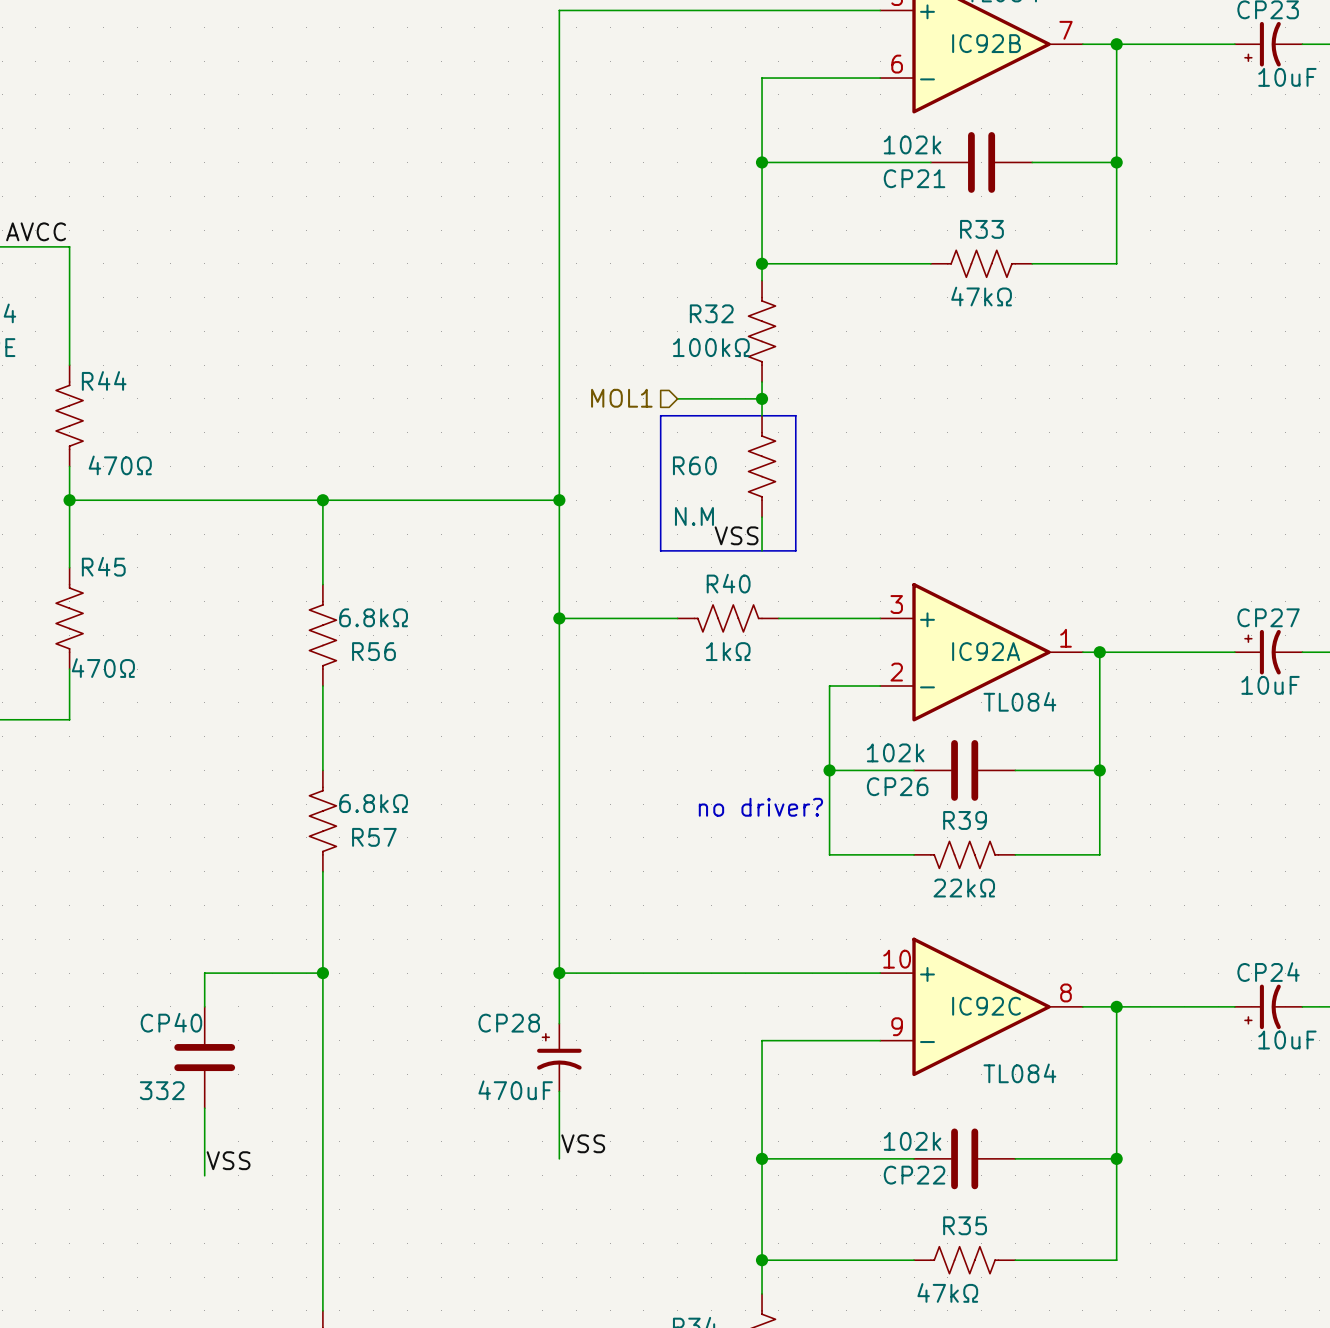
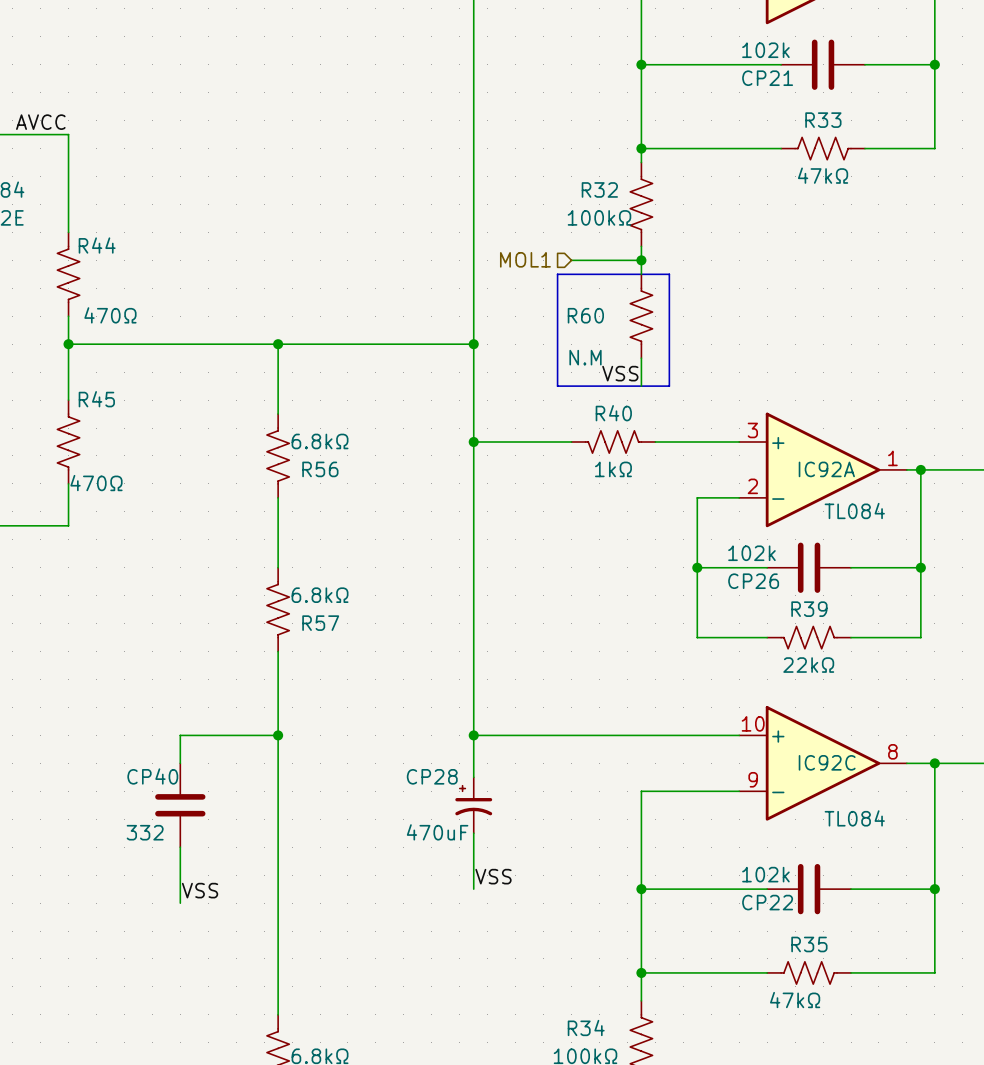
text: no driver? (760, 807) -> none

